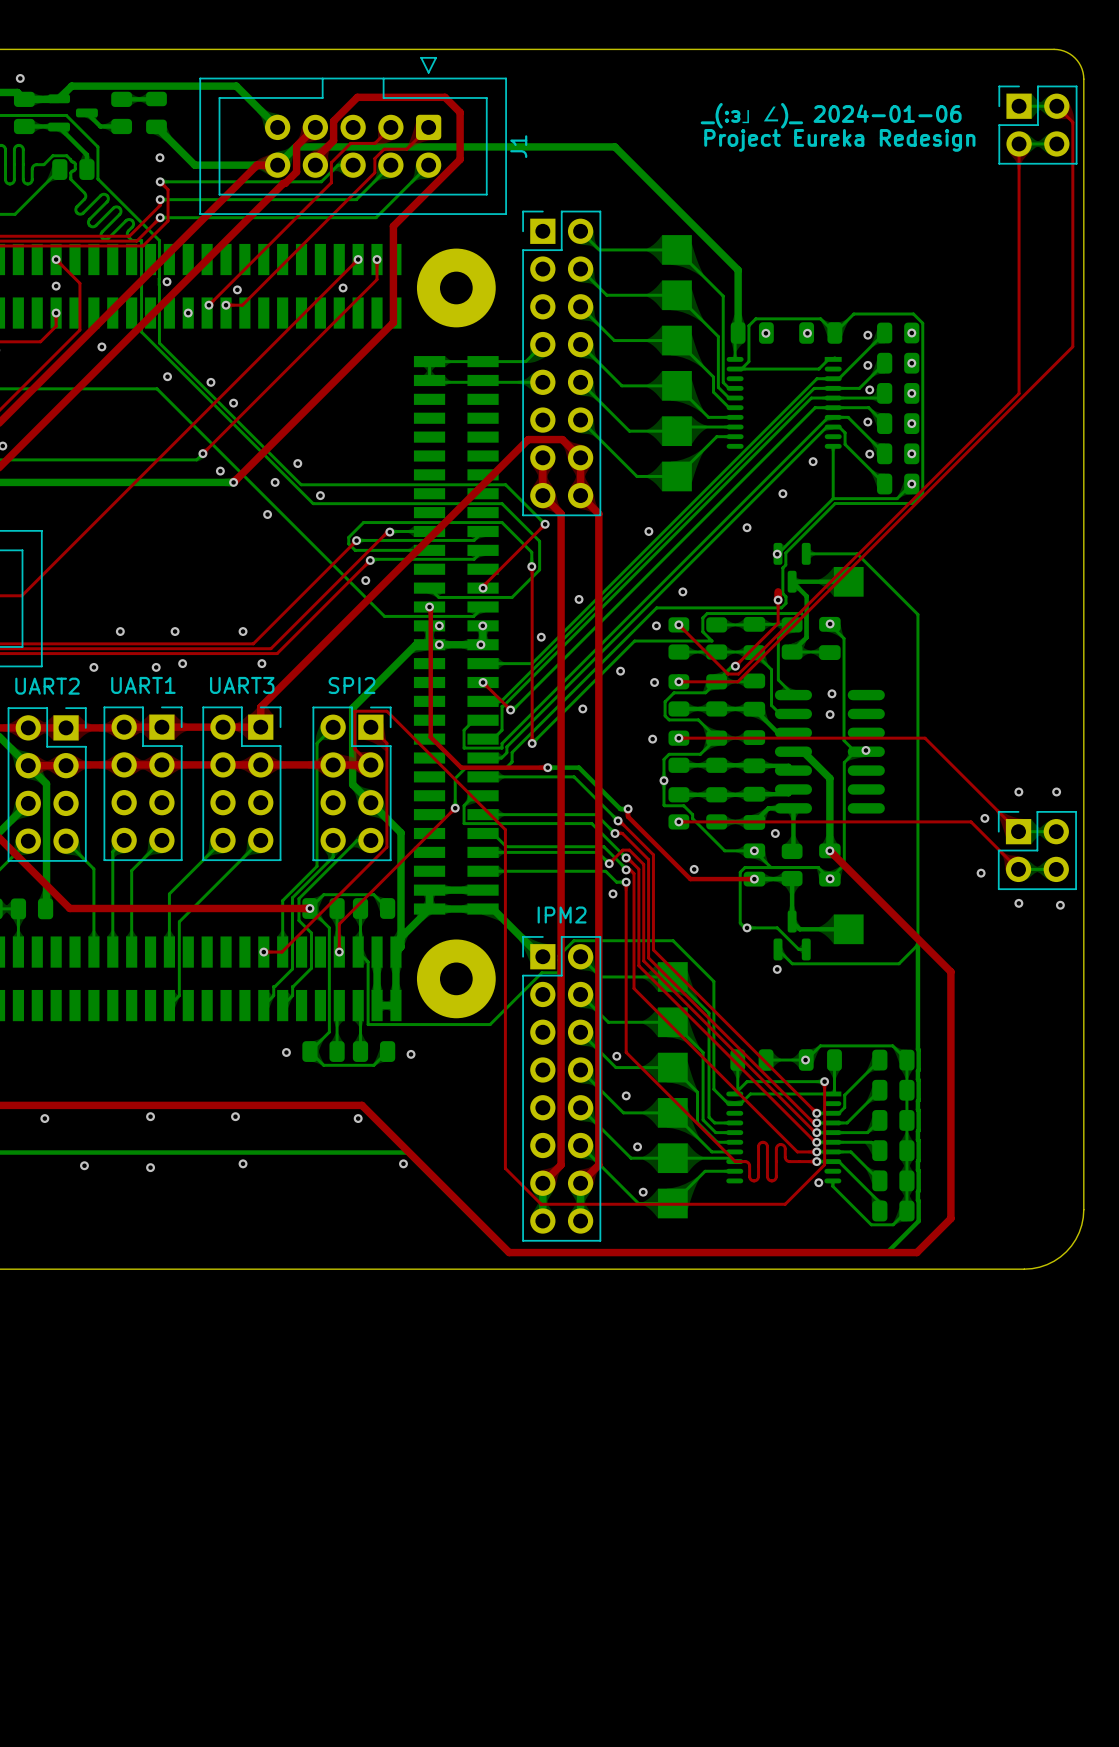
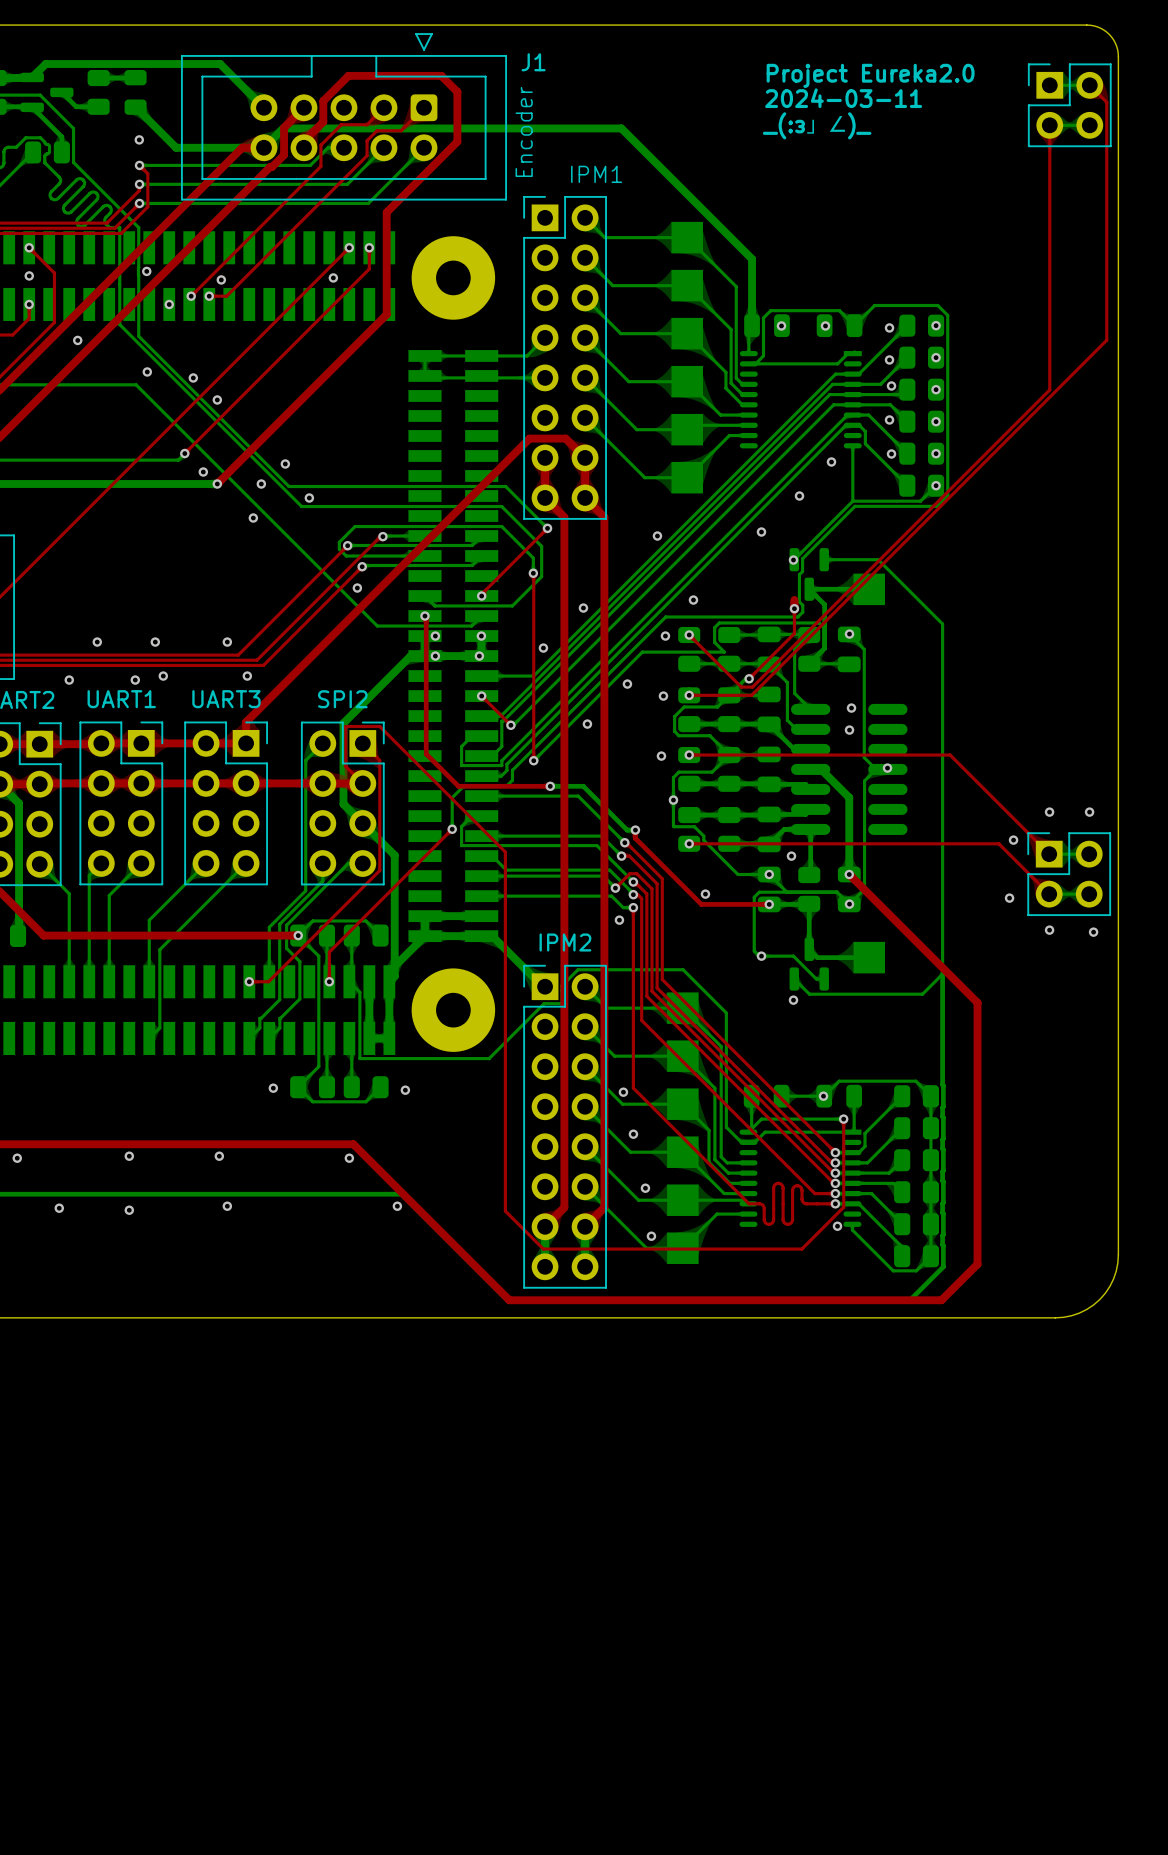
text: none -> Project Eureka2.0 (870, 75)
text: _(:з」∠)_ 2024-01-06 (831, 115) -> none
text: none -> 2024-03-11 (843, 98)
text: Project Eureka Redesign (839, 140) -> none
text: none -> _(:з」∠)_ (817, 125)
J1 name rotation: 0° (518, 146) -> 90° clockwise (533, 62)
J1 name position: J1 (518, 146) -> J1 (533, 62)
text: none -> Encoder (524, 131)
text: none -> IPM1 (596, 174)

